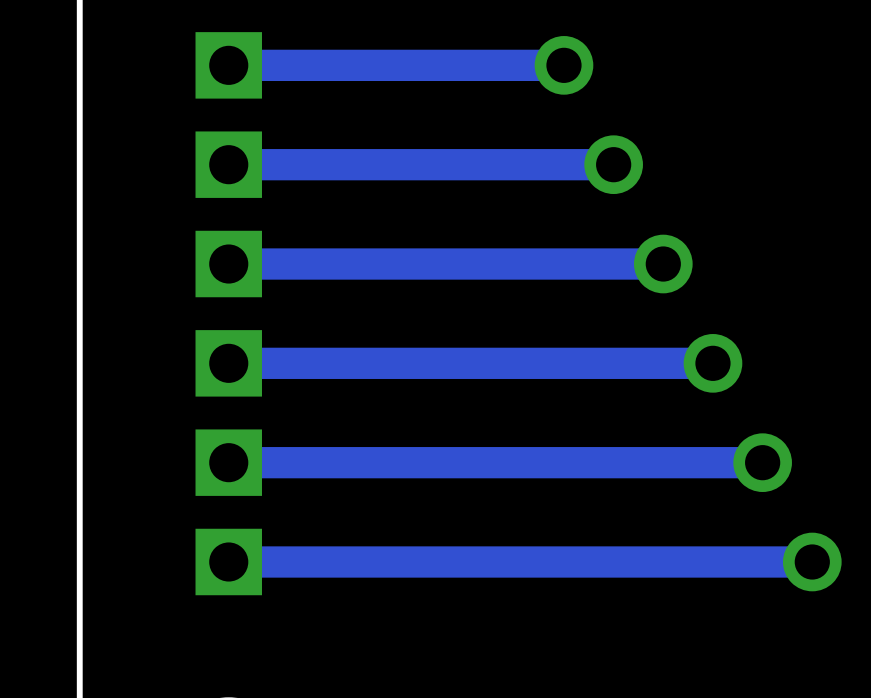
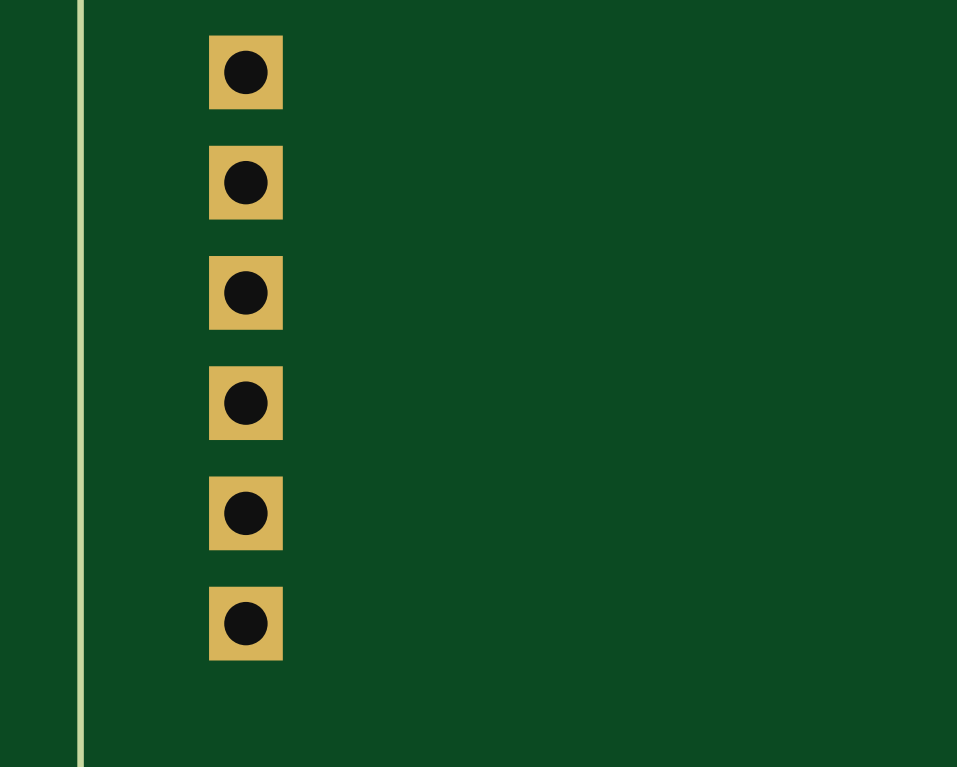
track: (563, 65) (228, 65) -> none
via: (563, 65) -> none
track: (613, 164) (228, 164) -> none
via: (613, 164) -> none
track: (663, 264) (228, 264) -> none
via: (663, 264) -> none
track: (712, 363) (228, 363) -> none
via: (712, 363) -> none
track: (762, 462) (228, 462) -> none
via: (762, 462) -> none
track: (812, 561) (228, 561) -> none
via: (812, 561) -> none

